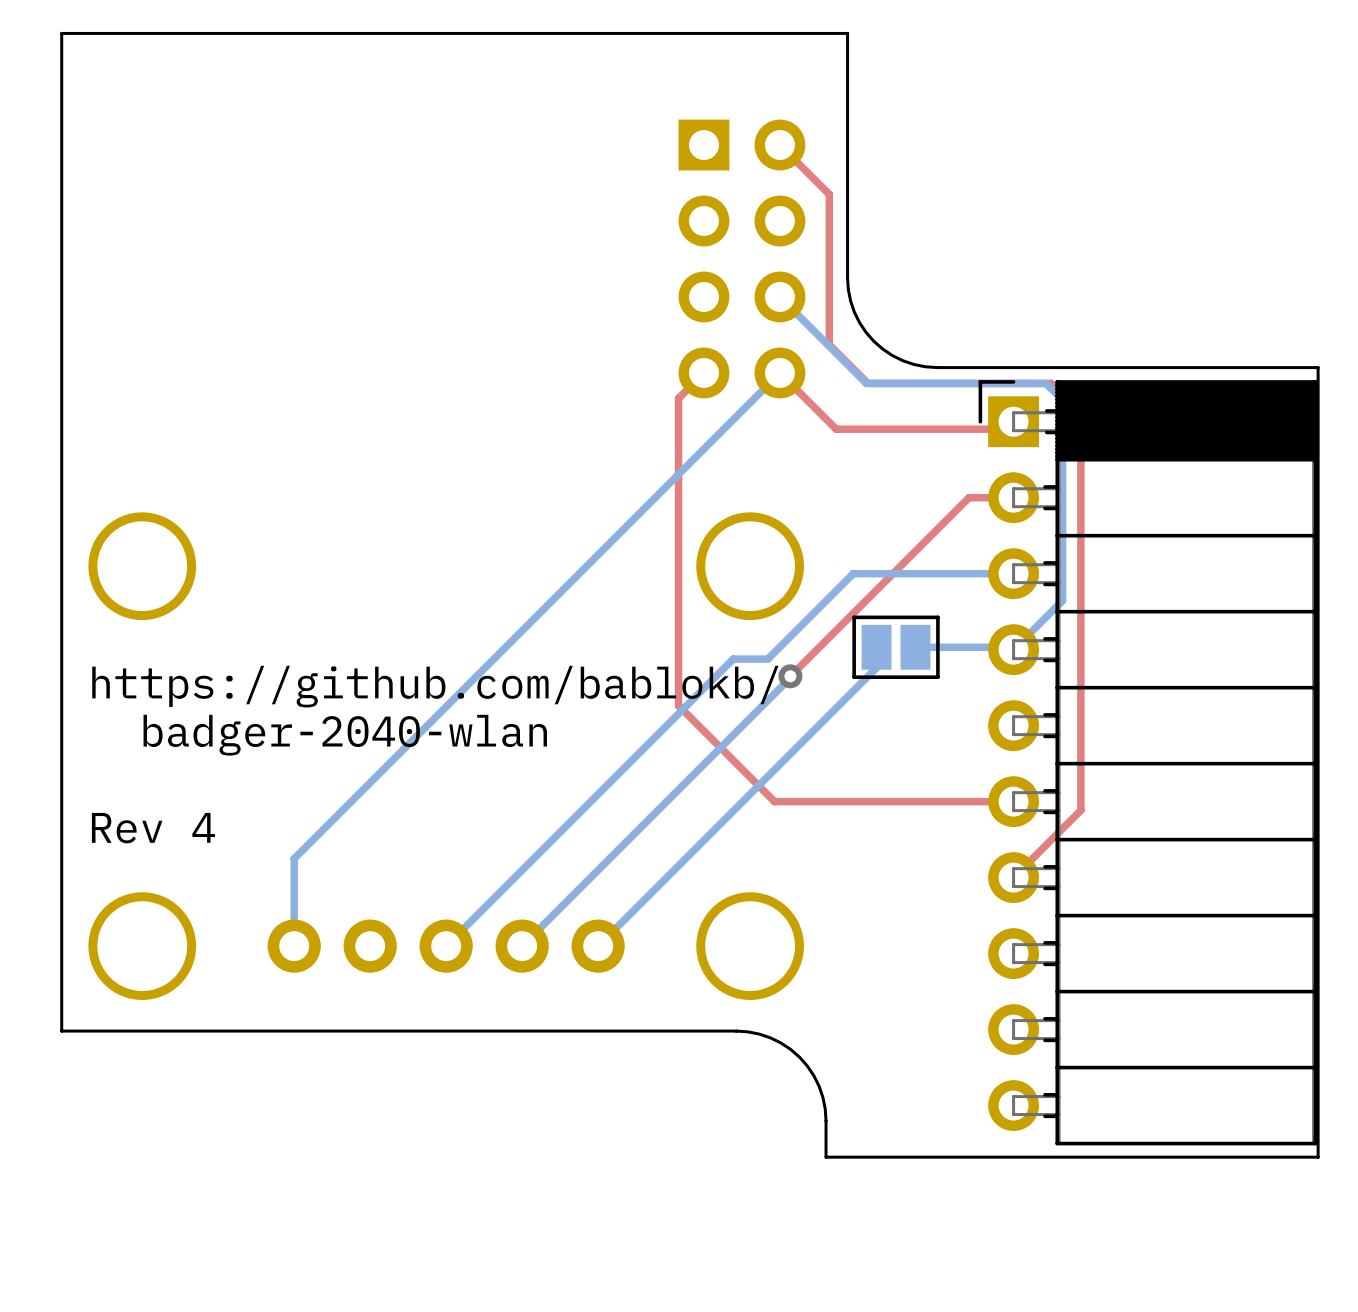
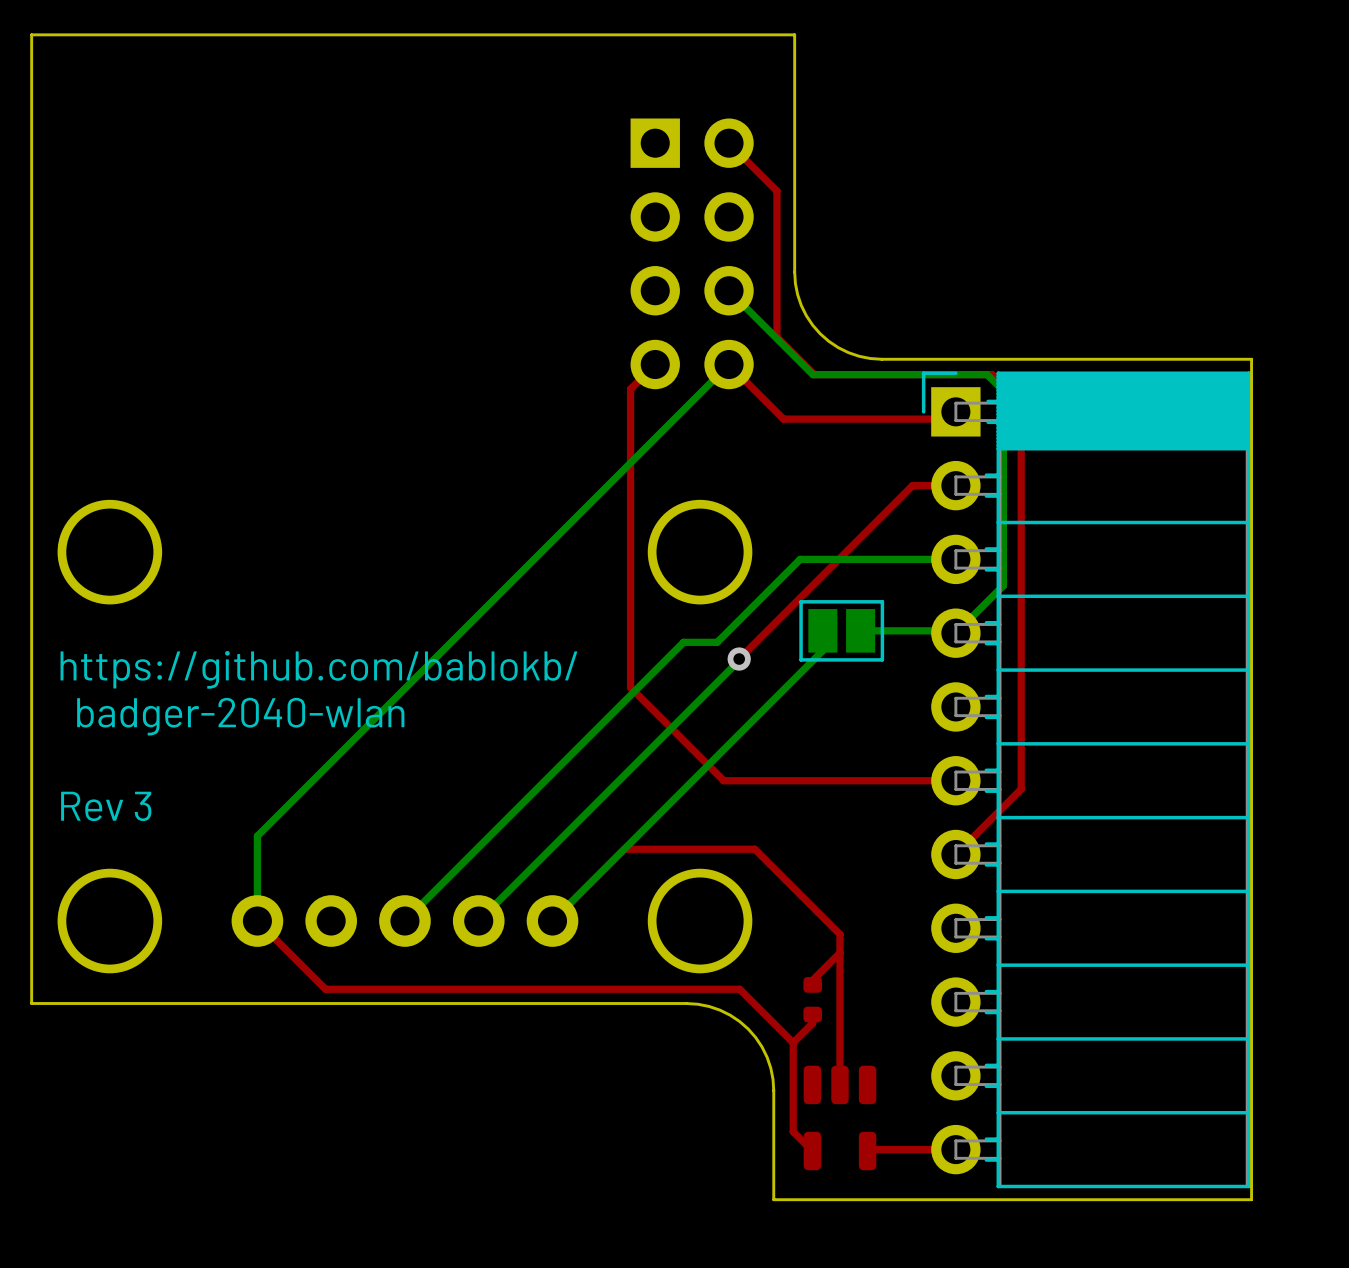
part: (1147, 762) -> none
part: none -> (1086, 779)
text: Rev 4 (153, 828) -> Rev 3 (106, 806)
top track: none -> (257, 921) (325, 989) (739, 989) (793, 1042)
top track: none -> (552, 921) (624, 849) (754, 849) (839, 934) (839, 1084)
top track: none -> (839, 952) (812, 980) (812, 984)
part: none -> (812, 999)
top track: none -> (812, 1014) (812, 1023) (793, 1042)
top track: none -> (793, 1042) (793, 1131) (812, 1150)
part: none -> (839, 1117)
board edge: (1318, 1157) (826, 1157) -> (1251, 1125) (1251, 1199) (773, 1199) (773, 1125)
top track: none -> (955, 1149) (867, 1150)

